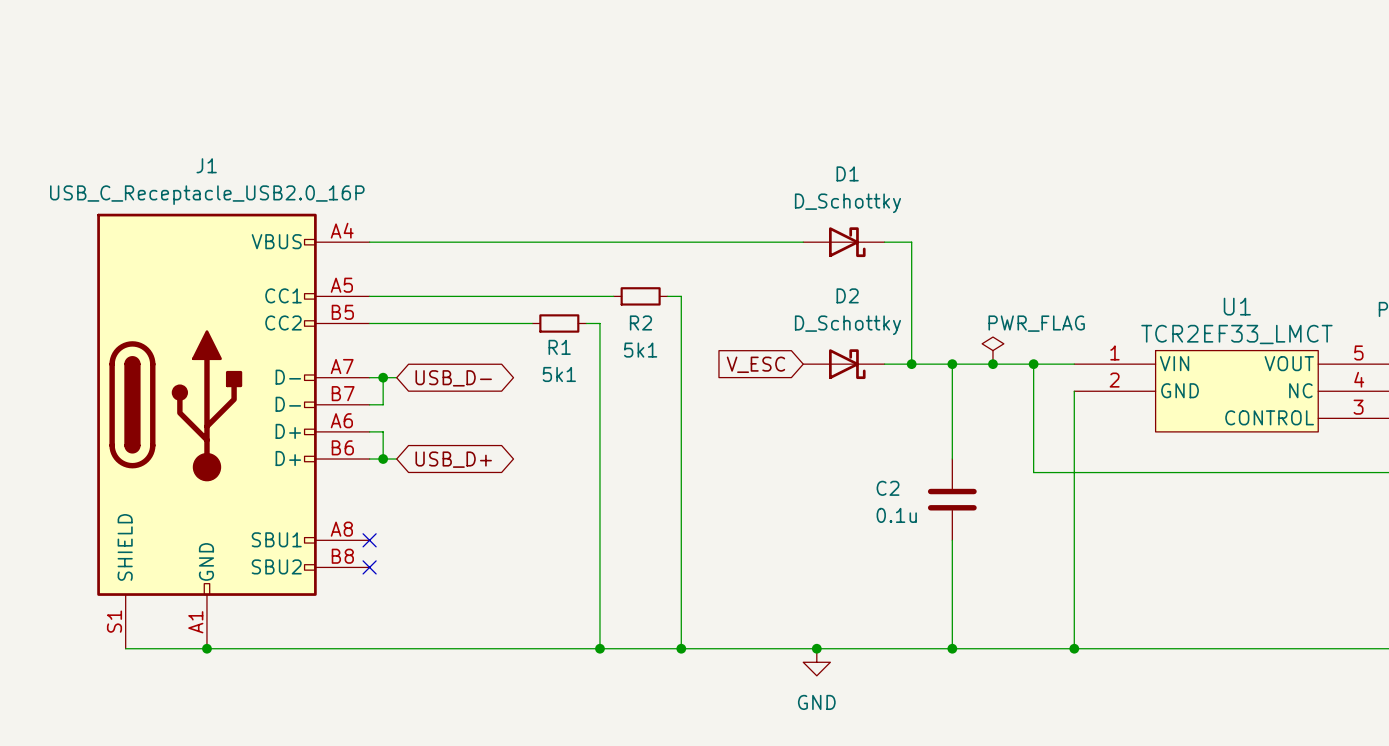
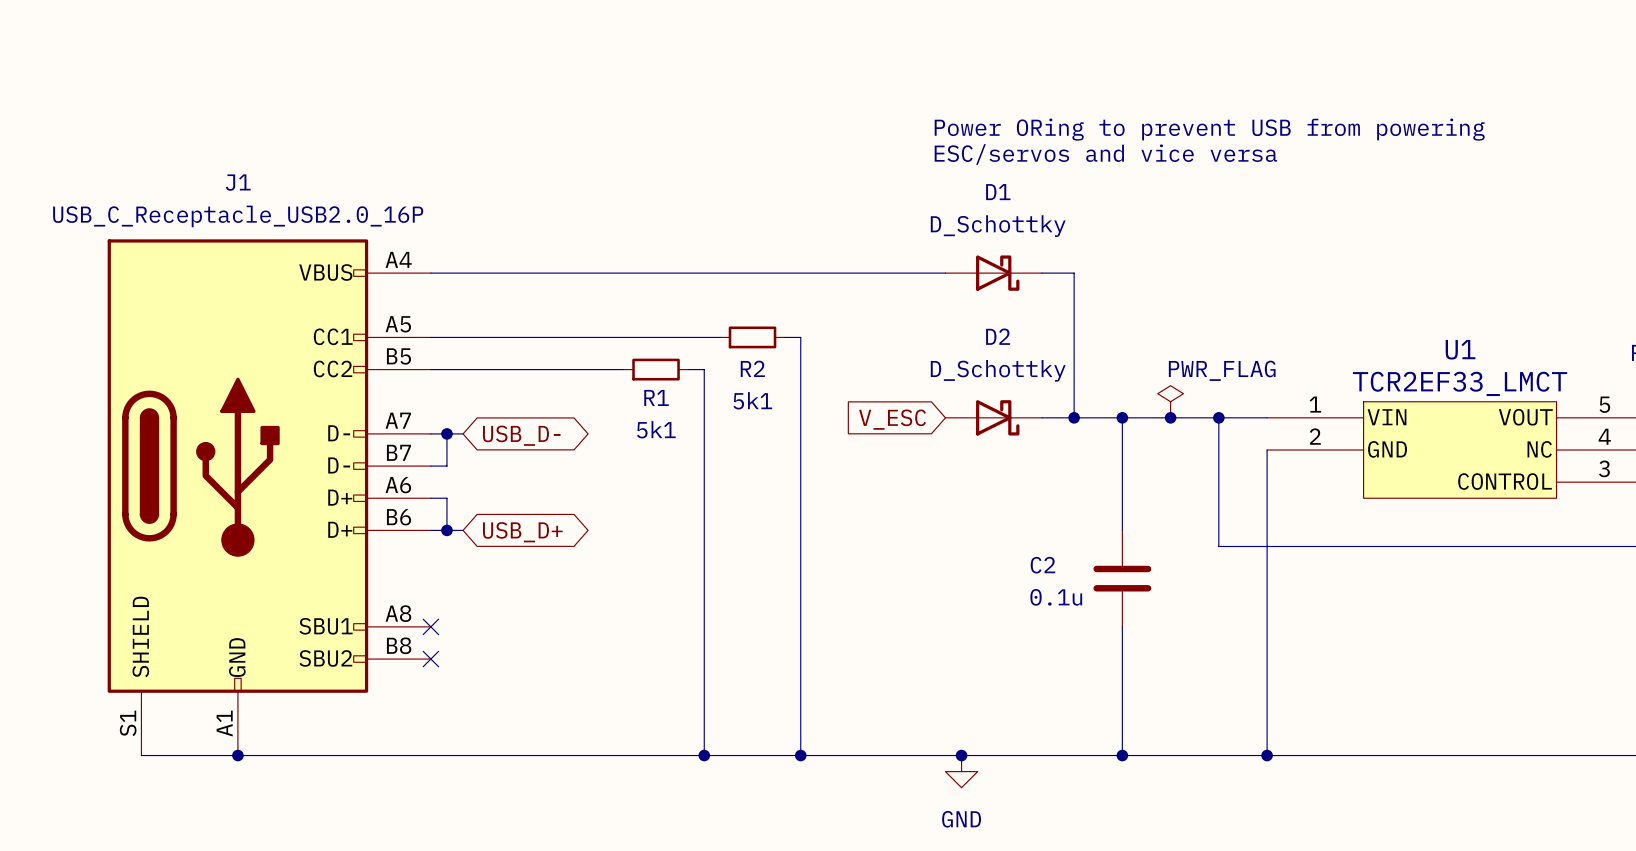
text: none -> Power ORing to prevent USB from powering (1209, 129)
text: none -> ESC/servos and vice versa (1105, 154)

